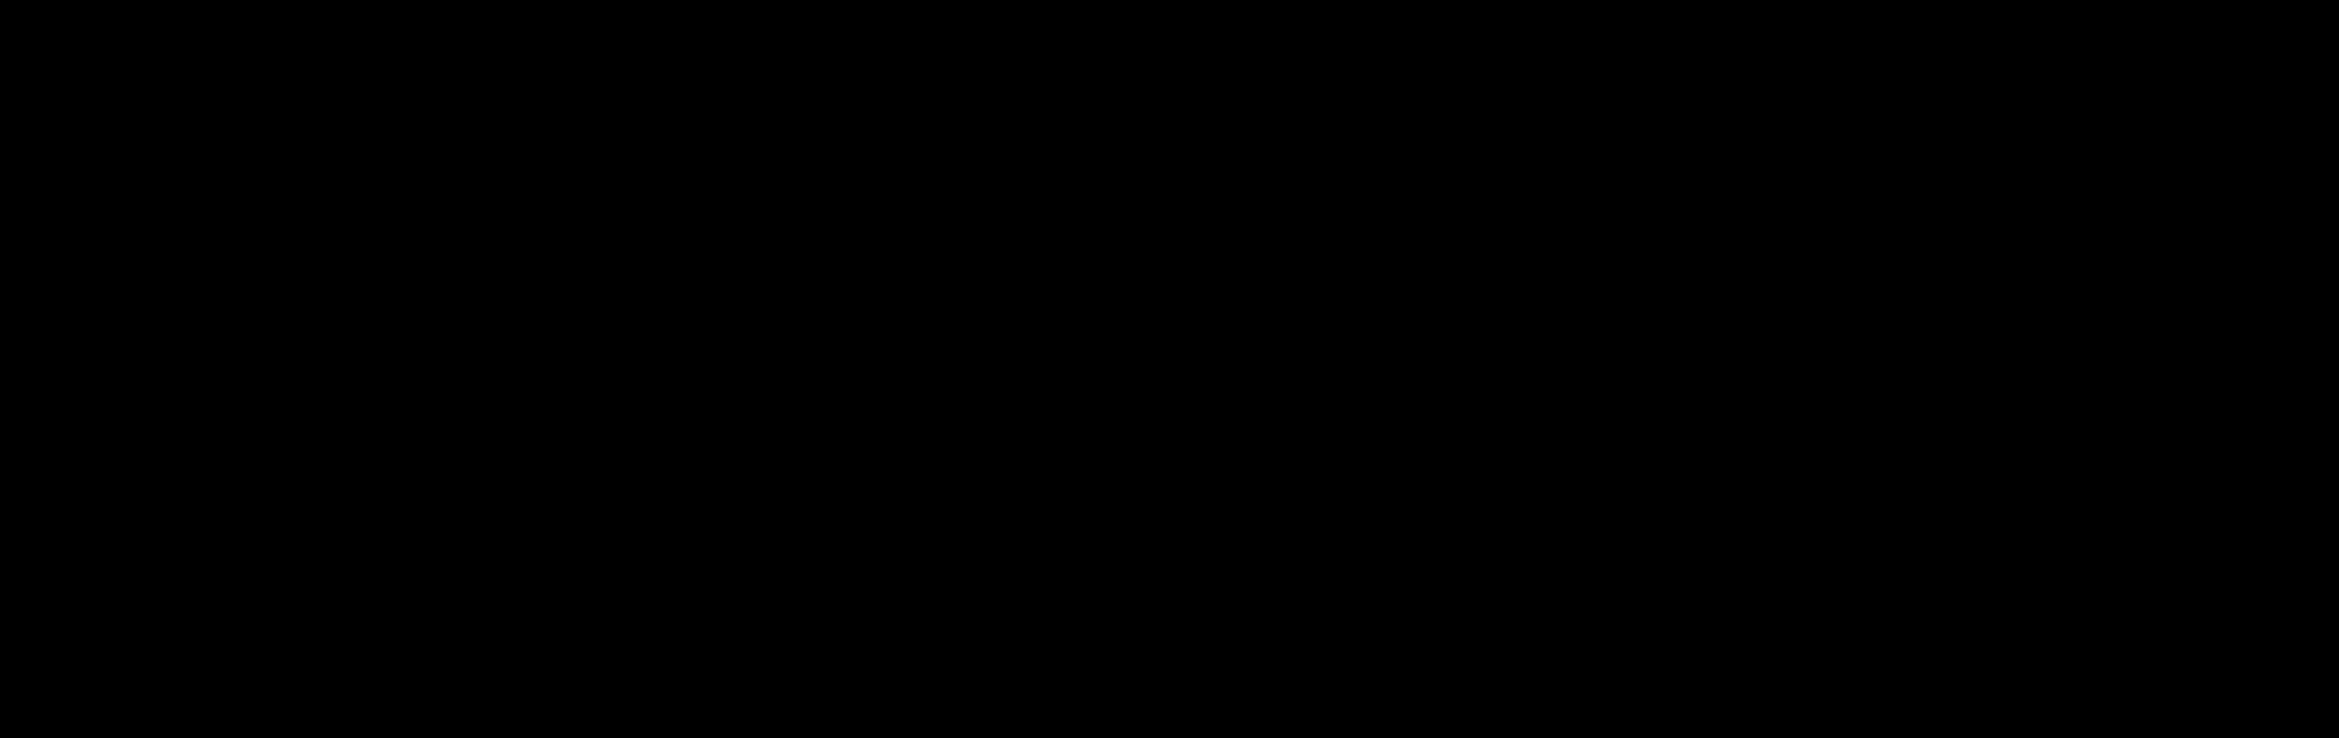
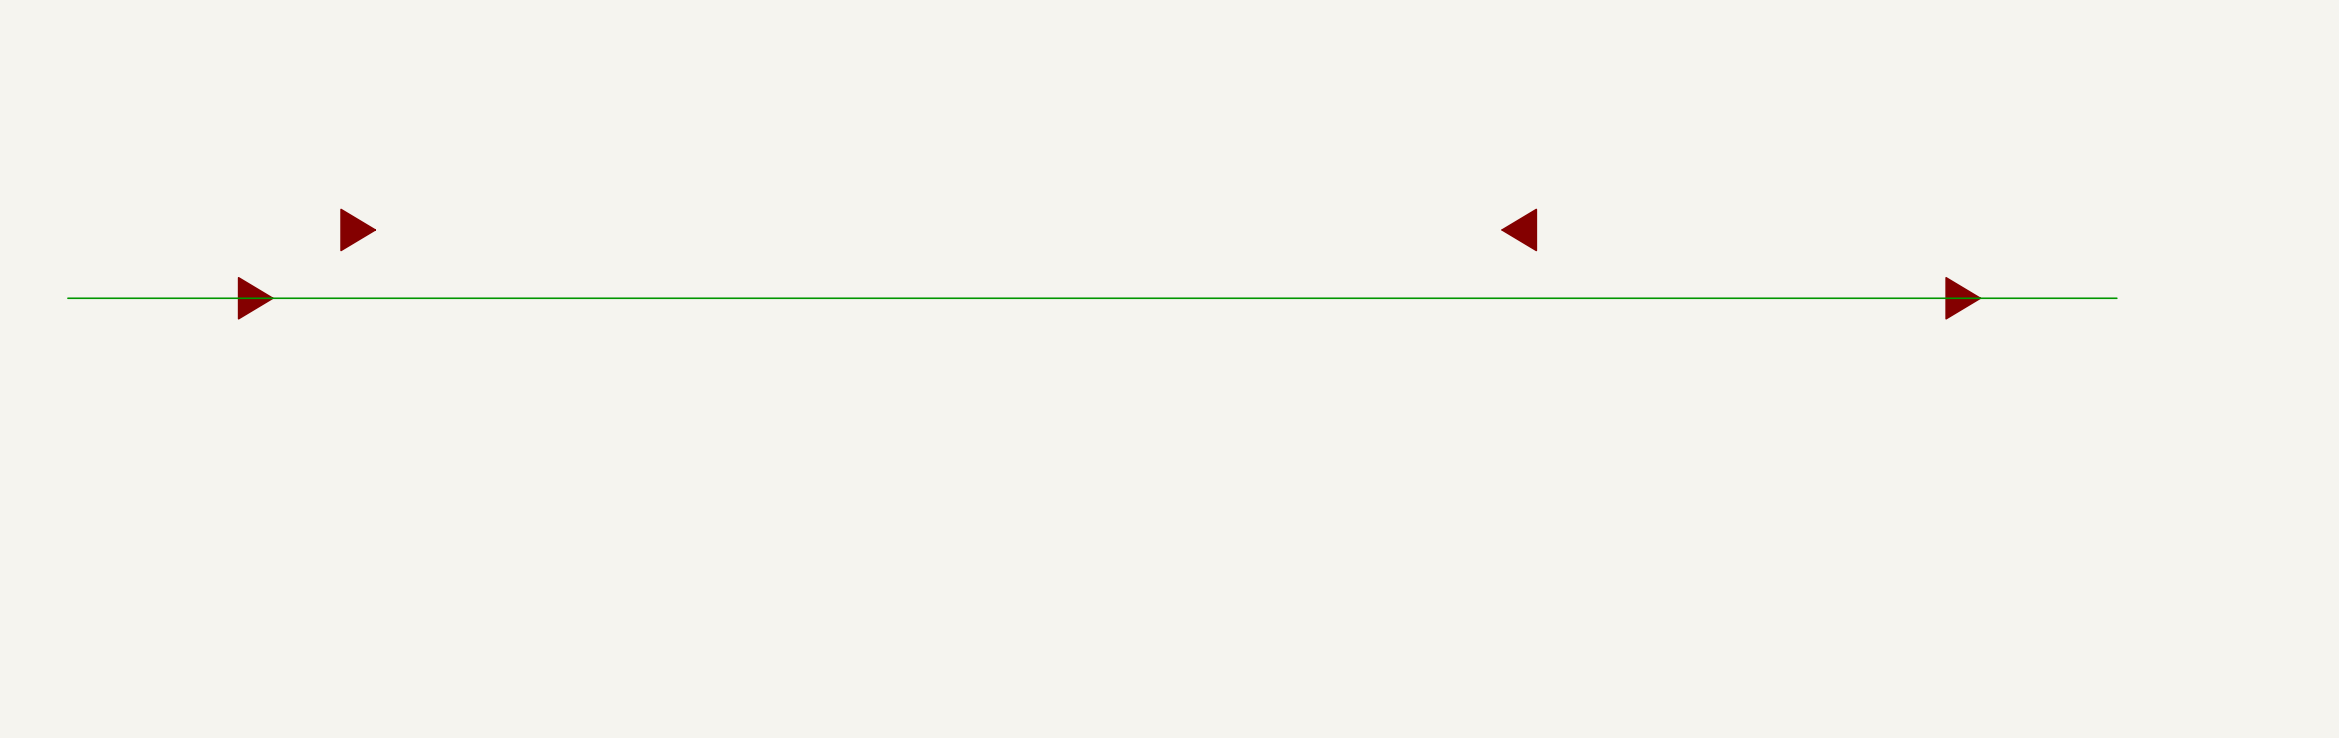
part: none -> (358, 229)
part: none -> (1519, 229)
wire: none -> (67, 298) (2116, 298)
part: none -> (255, 298)
part: none -> (1963, 298)

